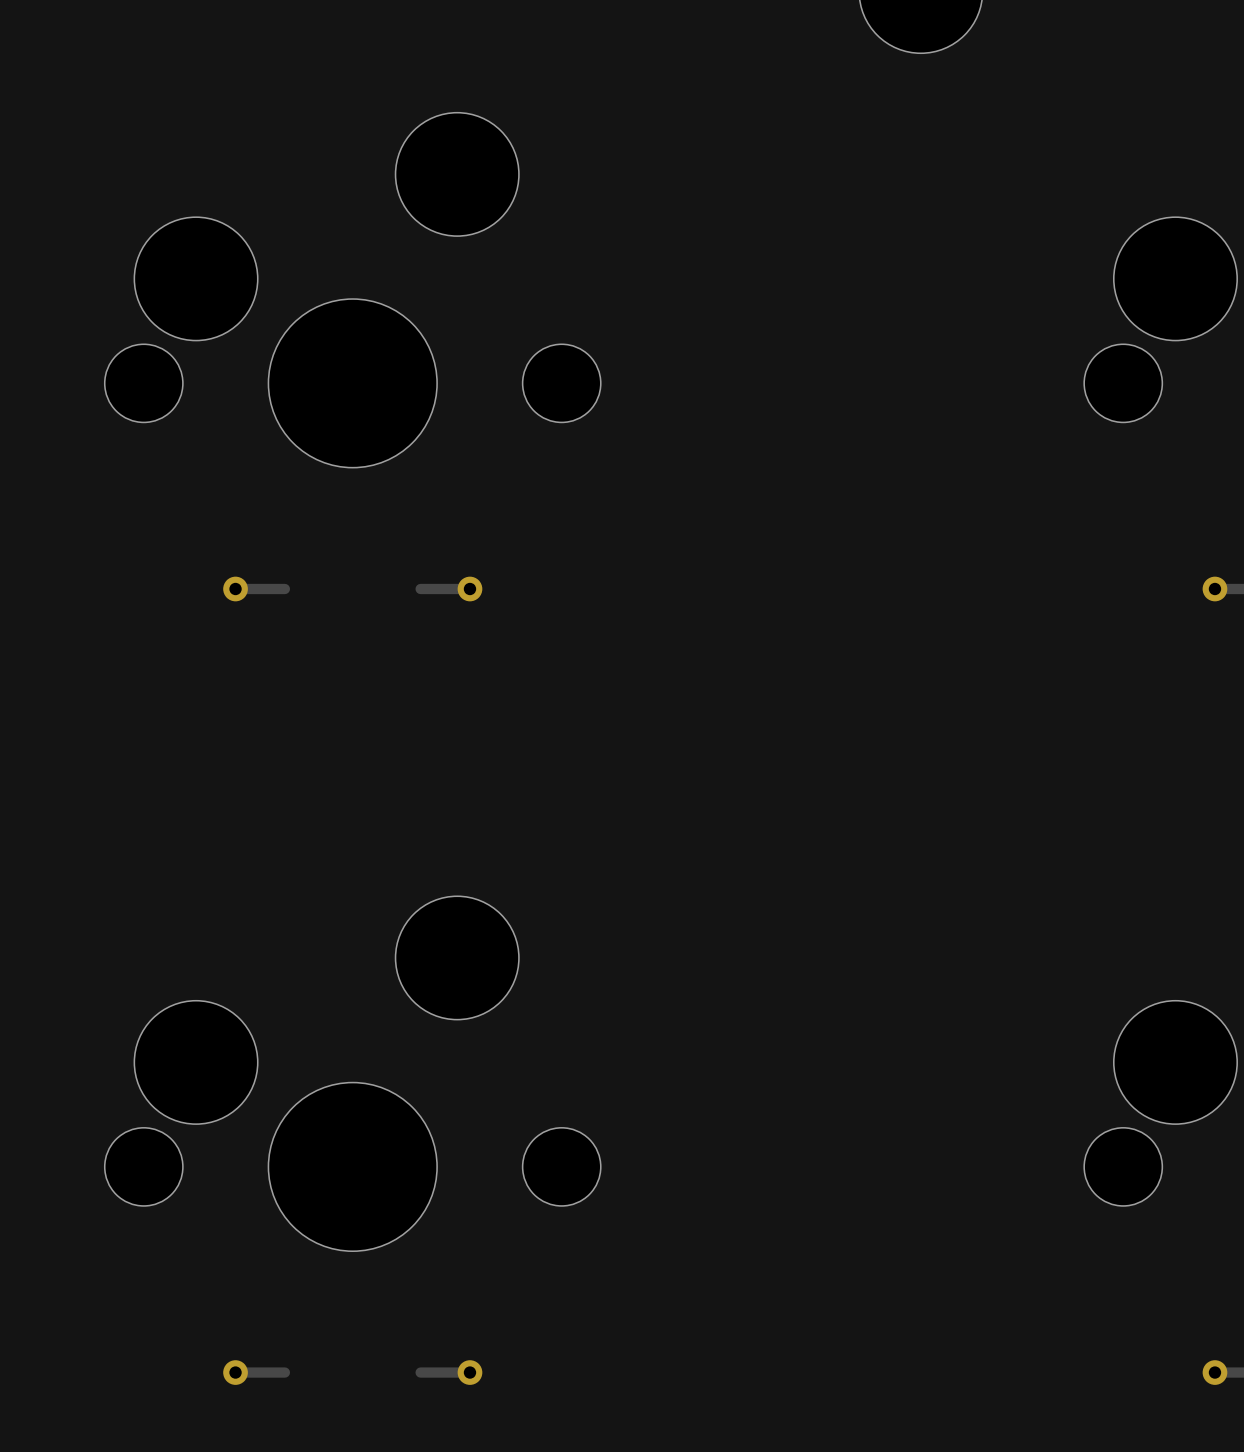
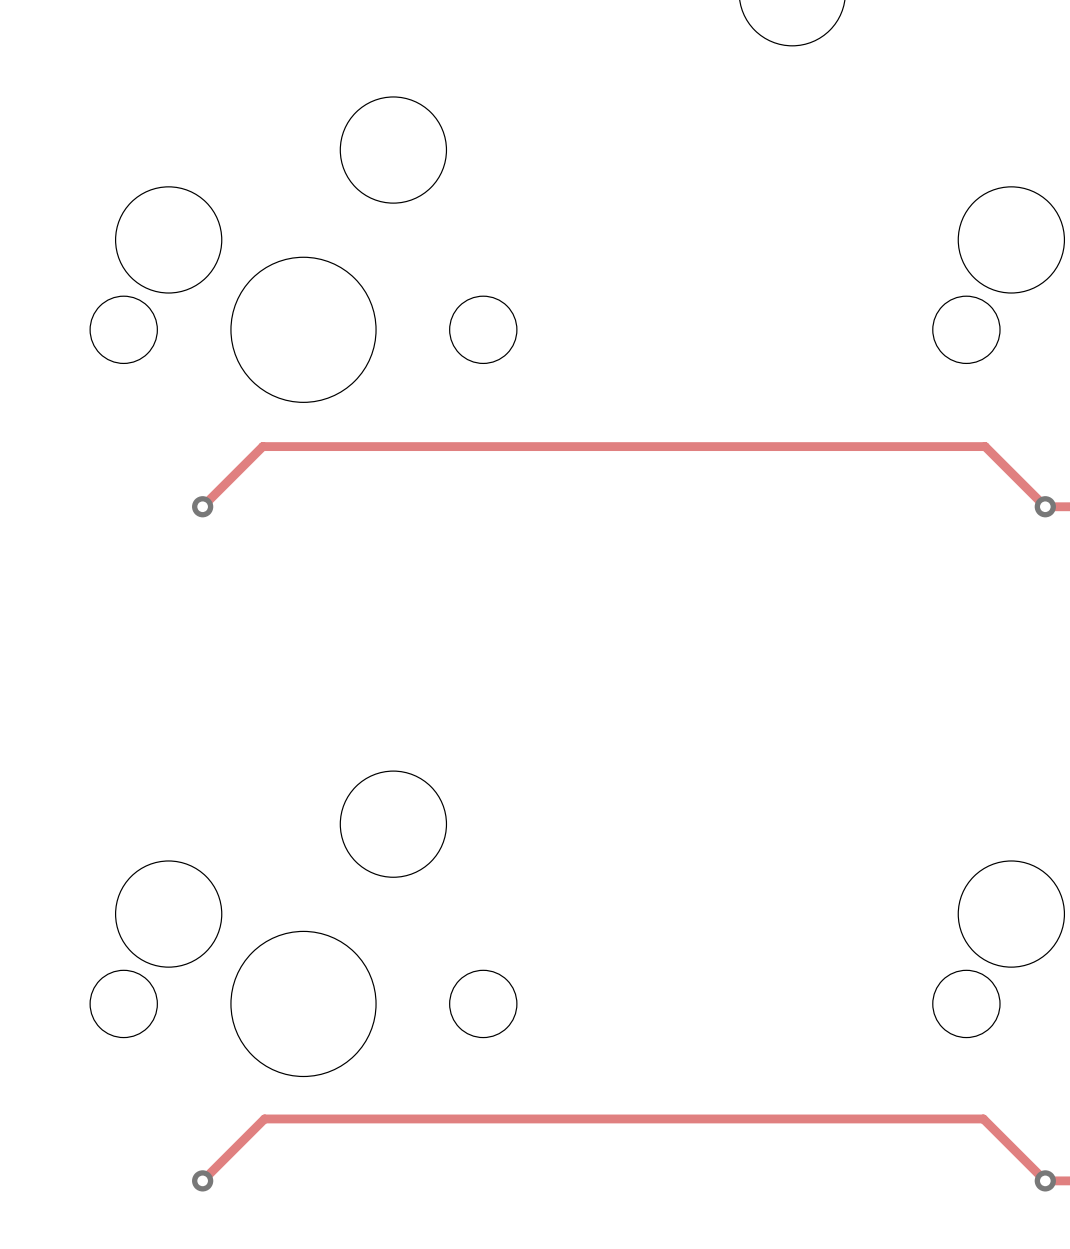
track: (235, 589) (284, 589) -> (202, 506) (262, 446) (985, 446) (1045, 506)
track: (420, 589) (469, 589) -> none
via: (469, 589) -> none
track: (235, 1372) (284, 1372) -> (202, 1180) (264, 1118) (983, 1118) (1045, 1180)
track: (420, 1372) (469, 1372) -> none
via: (469, 1372) -> none

